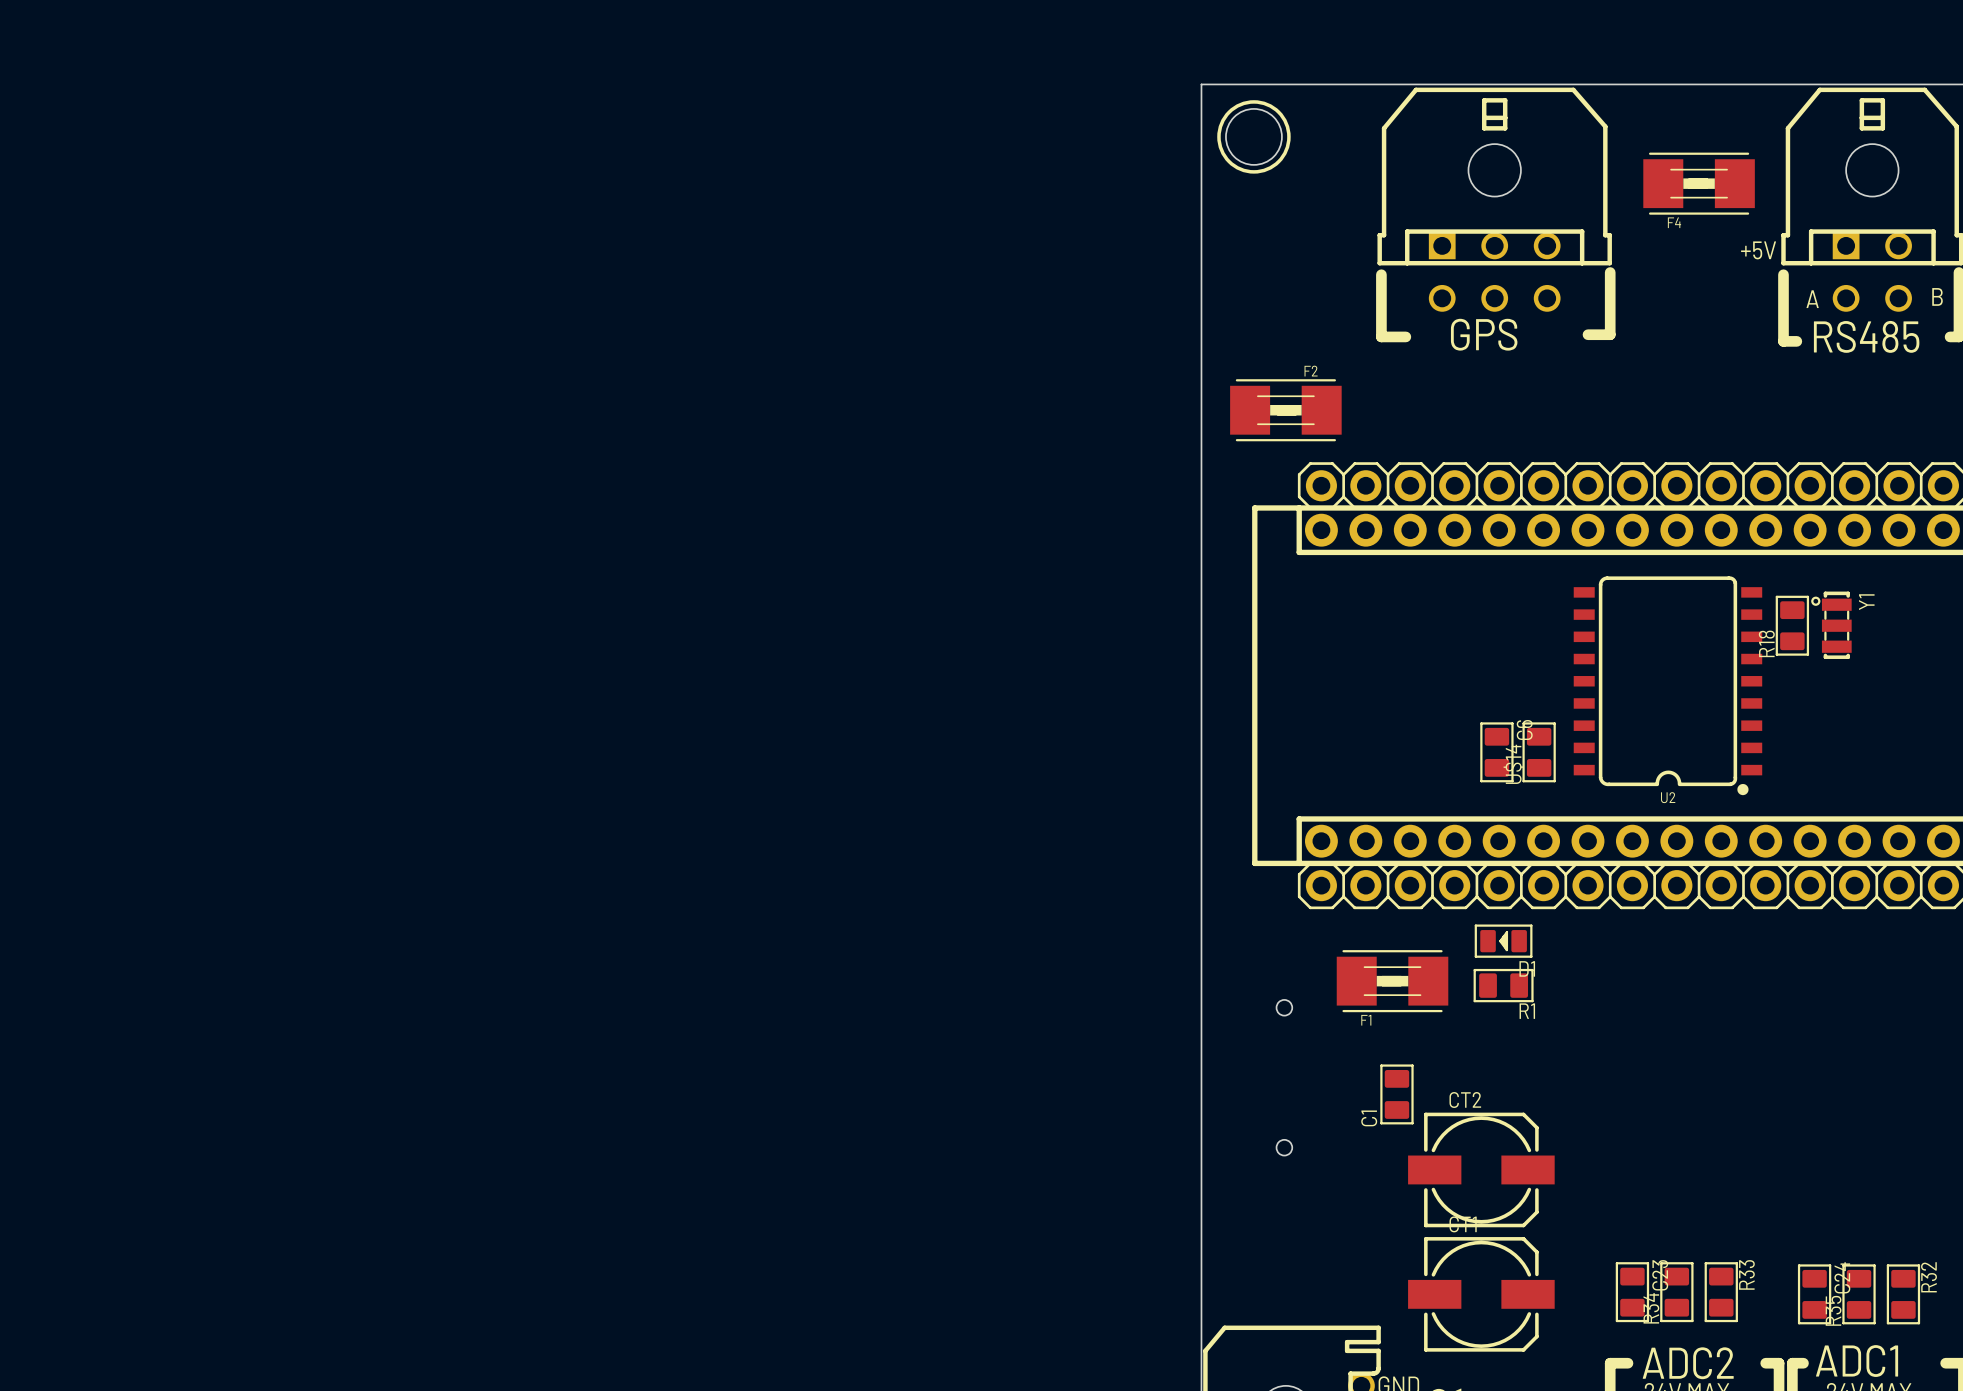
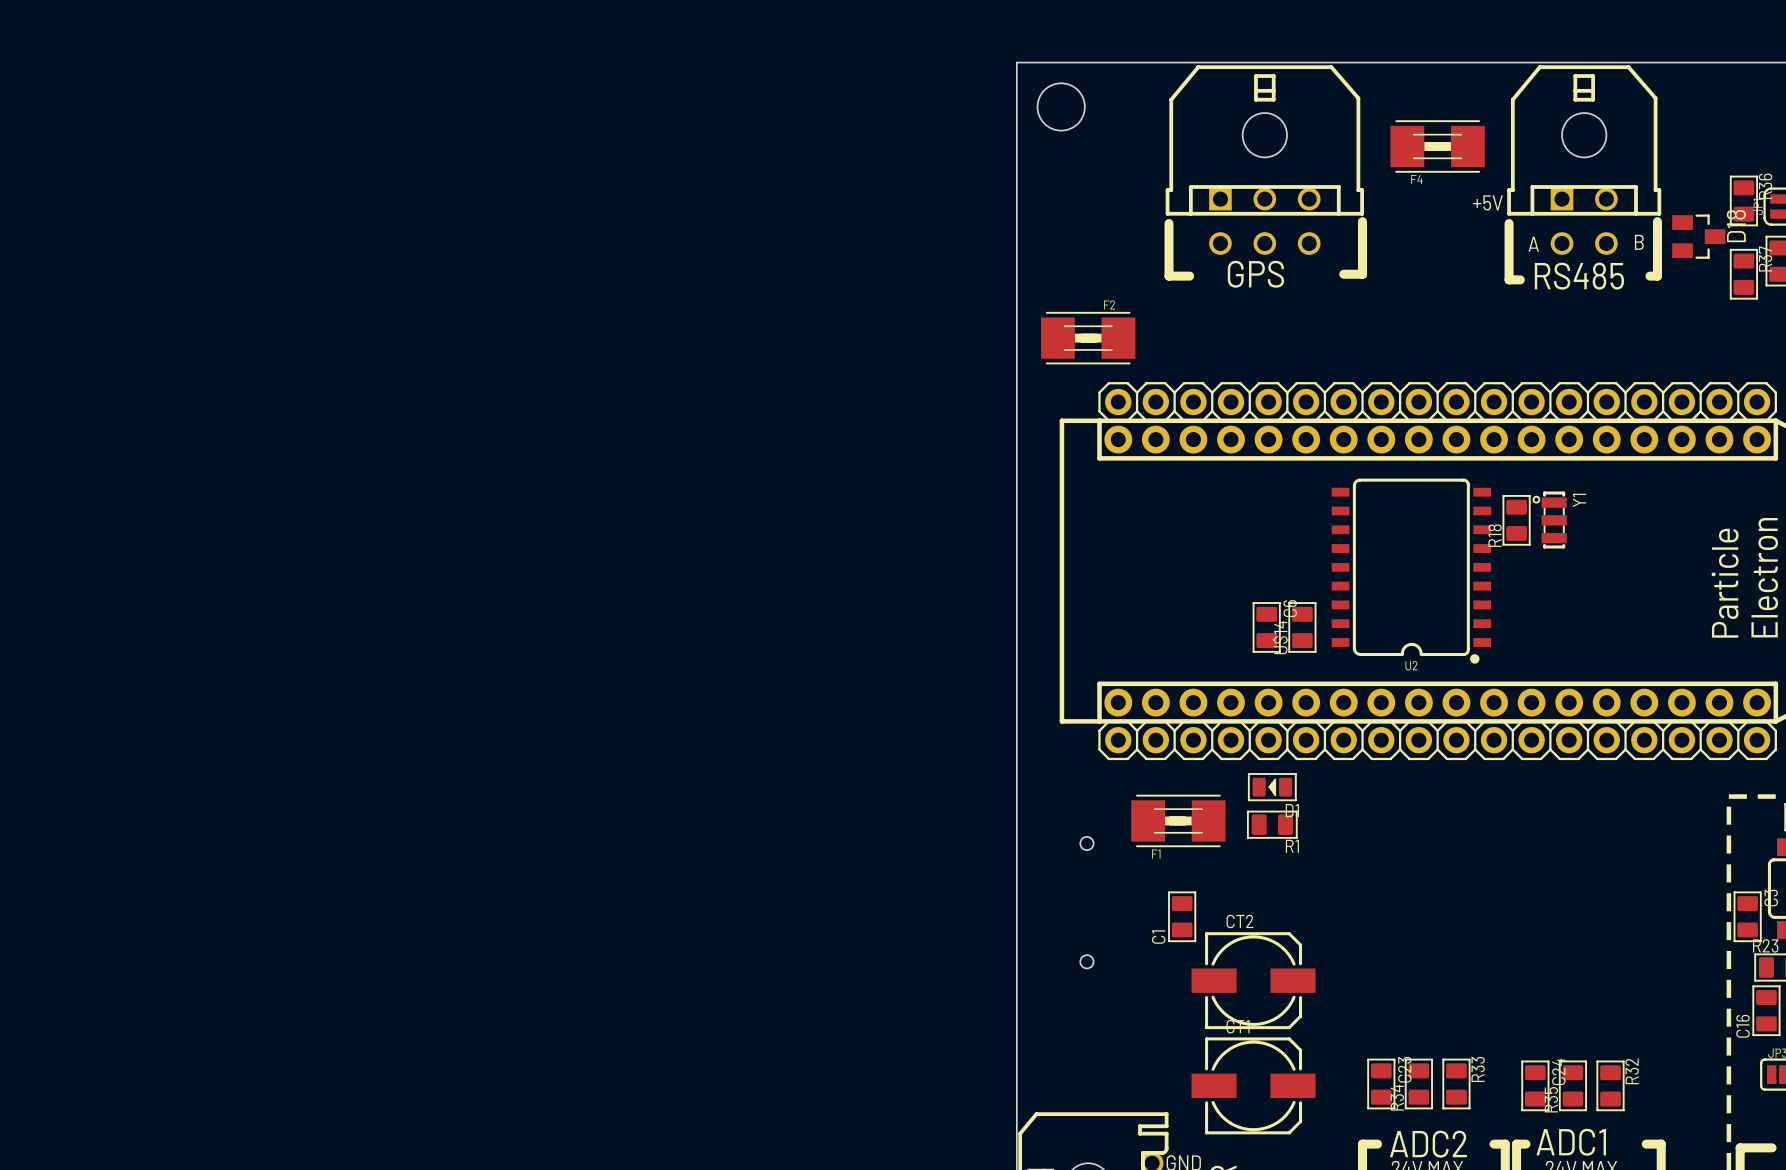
drawing: [1217, 100, 1291, 174] -> none

